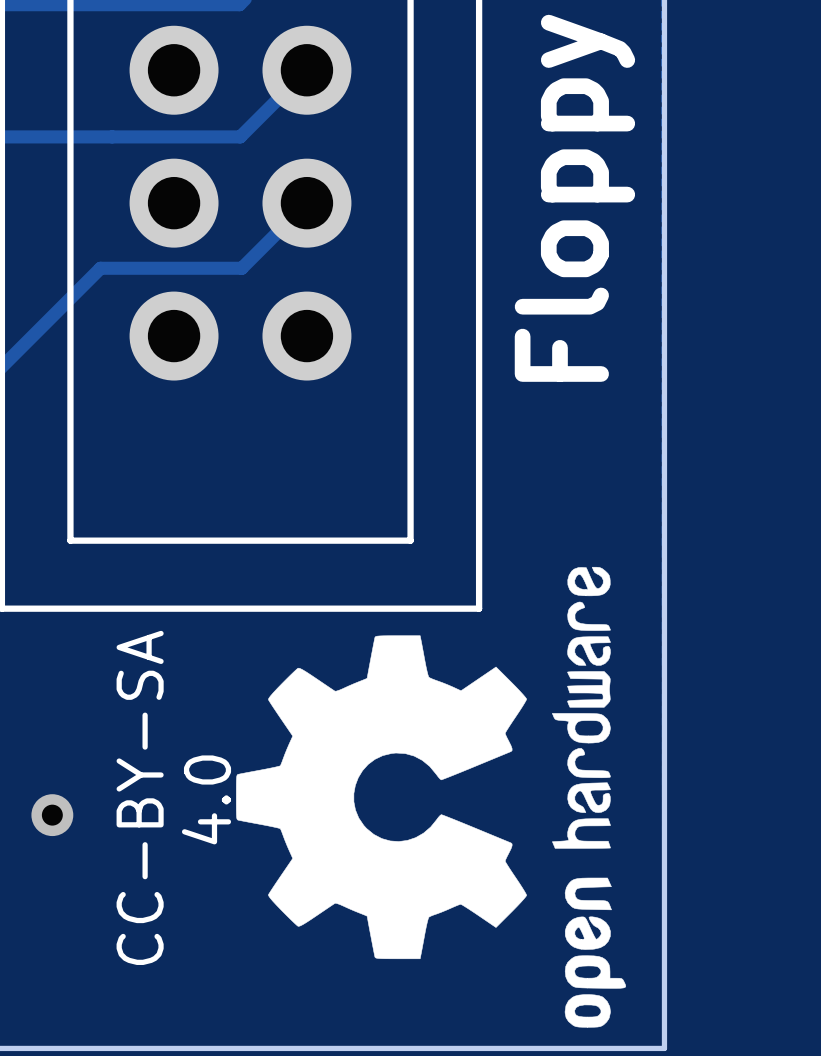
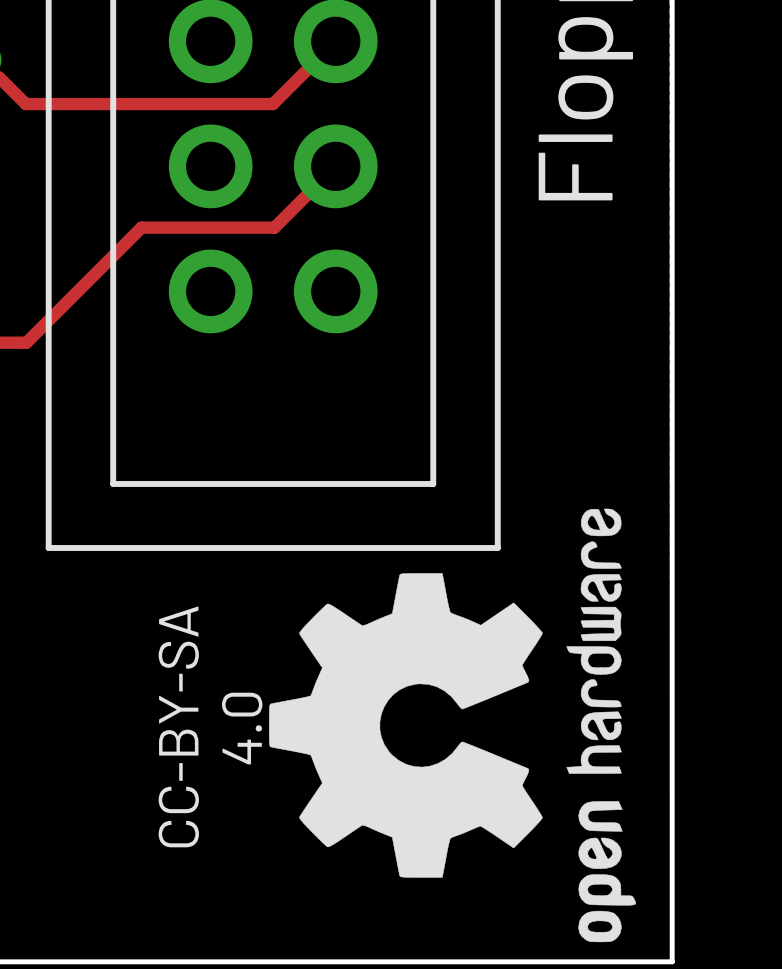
via: (52, 815) -> none

